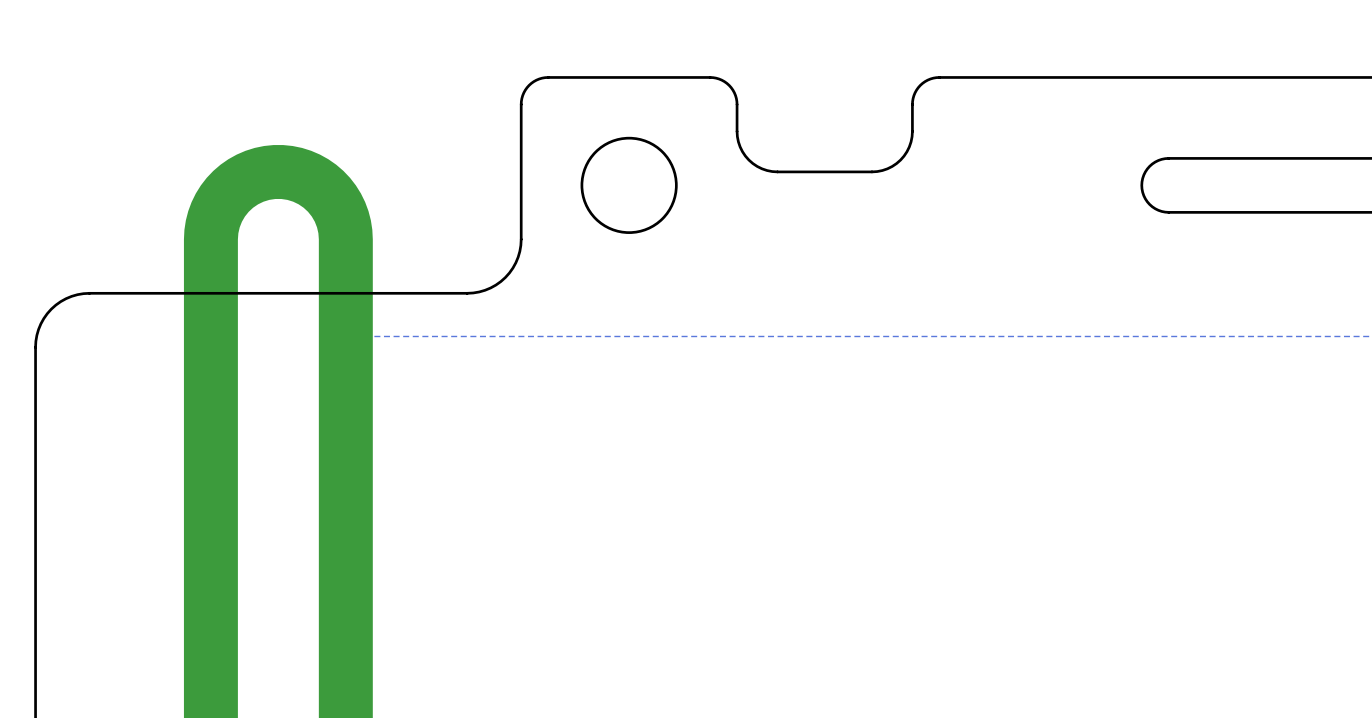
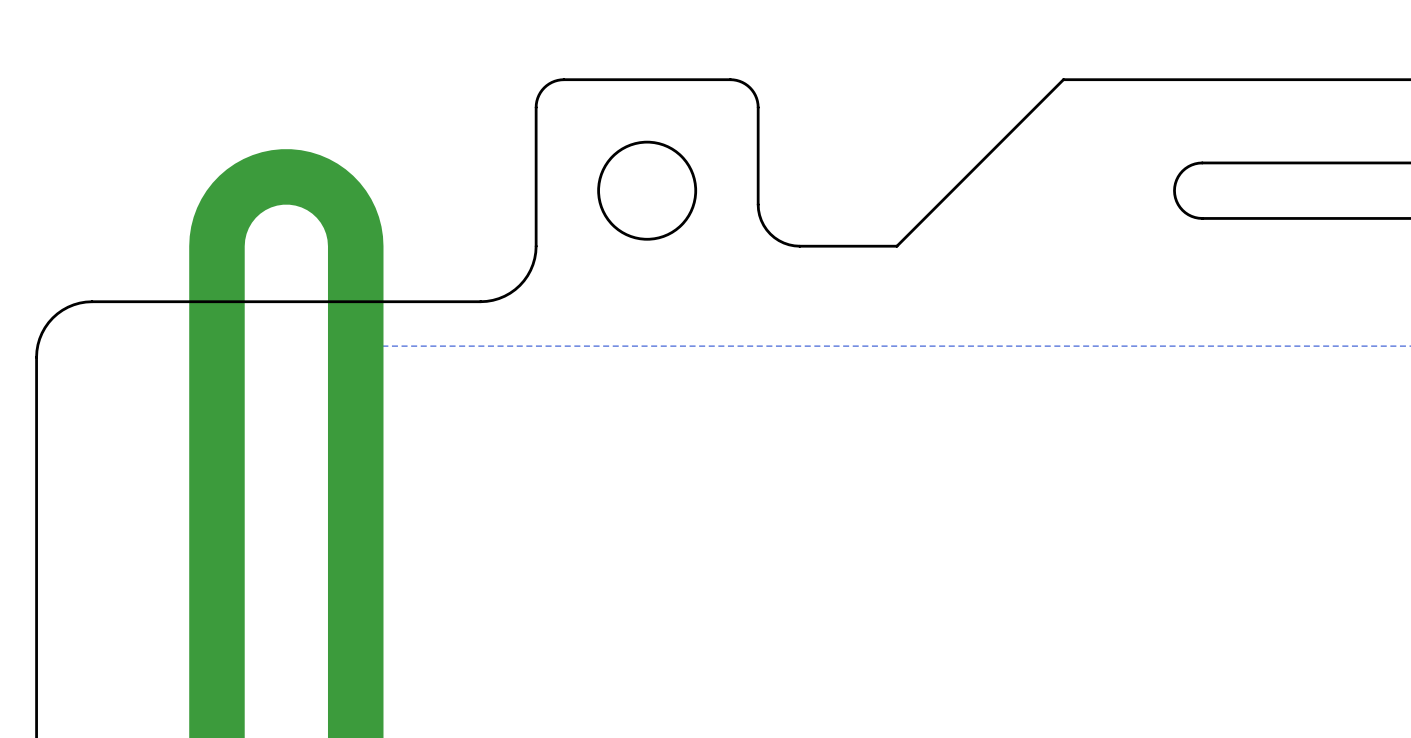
board edge: (1033, 77) (939, 77) (925, 81) (918, 87) (913, 98) (912, 136) (907, 151) (892, 166) (877, 171) (767, 170) (752, 163) (745, 156) (740, 146) (737, 131) -> (1063, 79) (896, 246) (794, 245) (774, 237) (763, 225) (758, 210) (758, 135)

